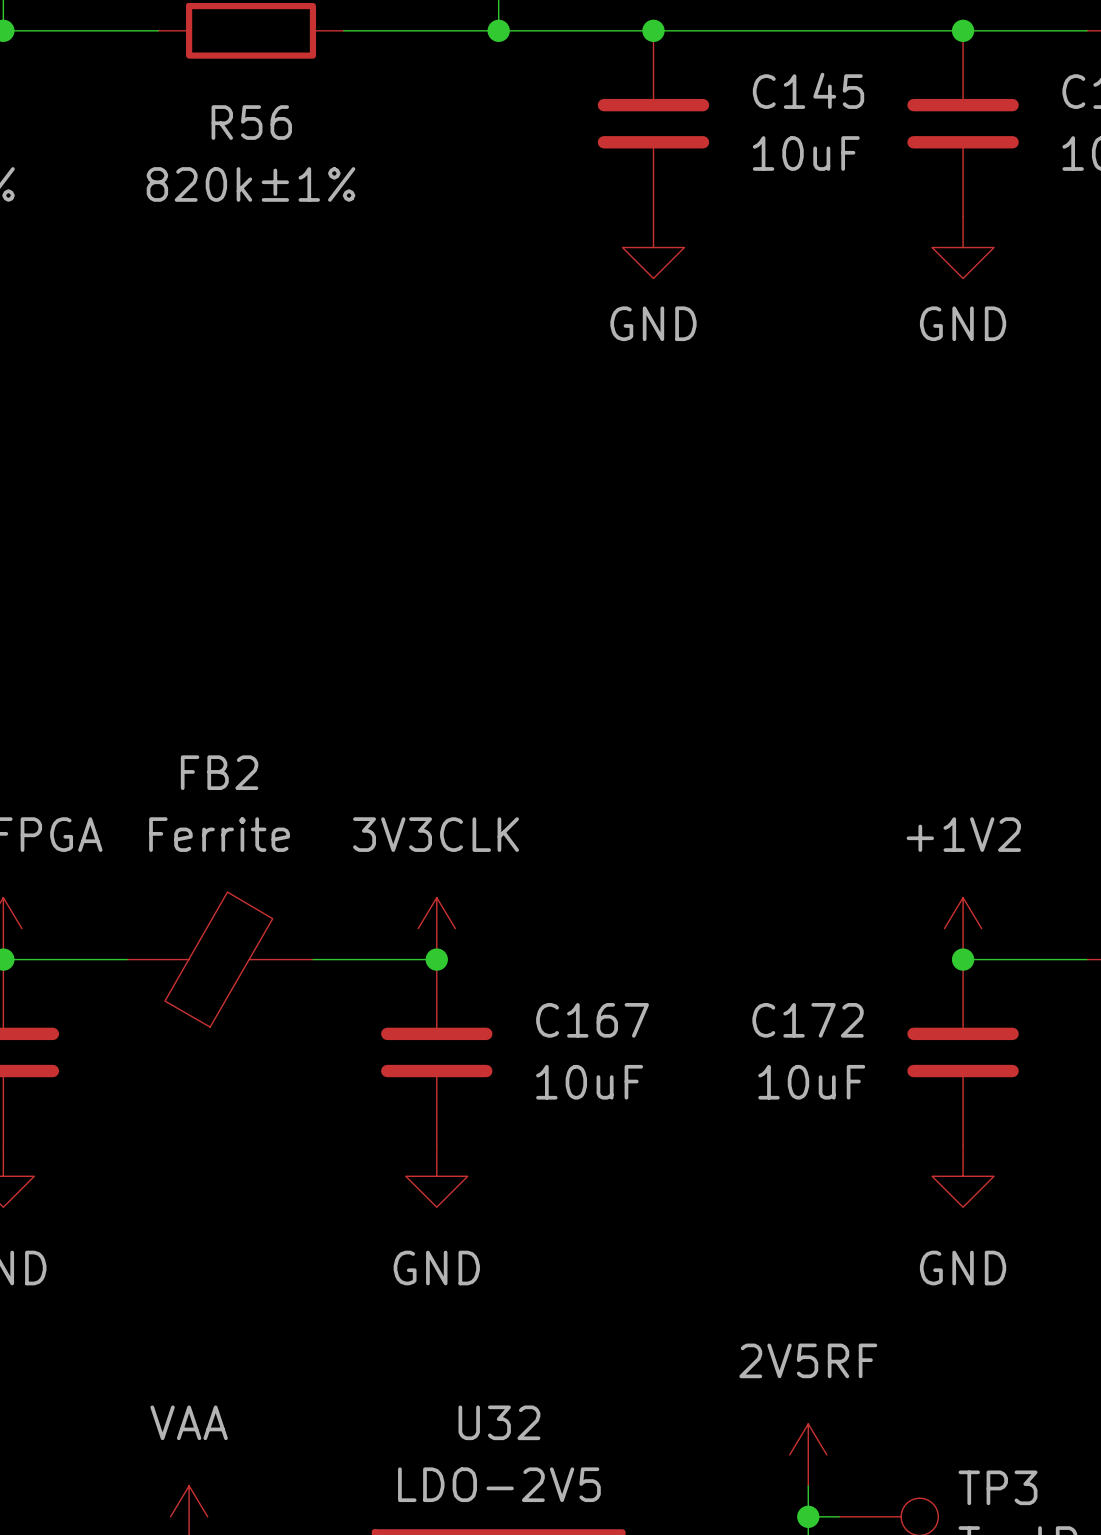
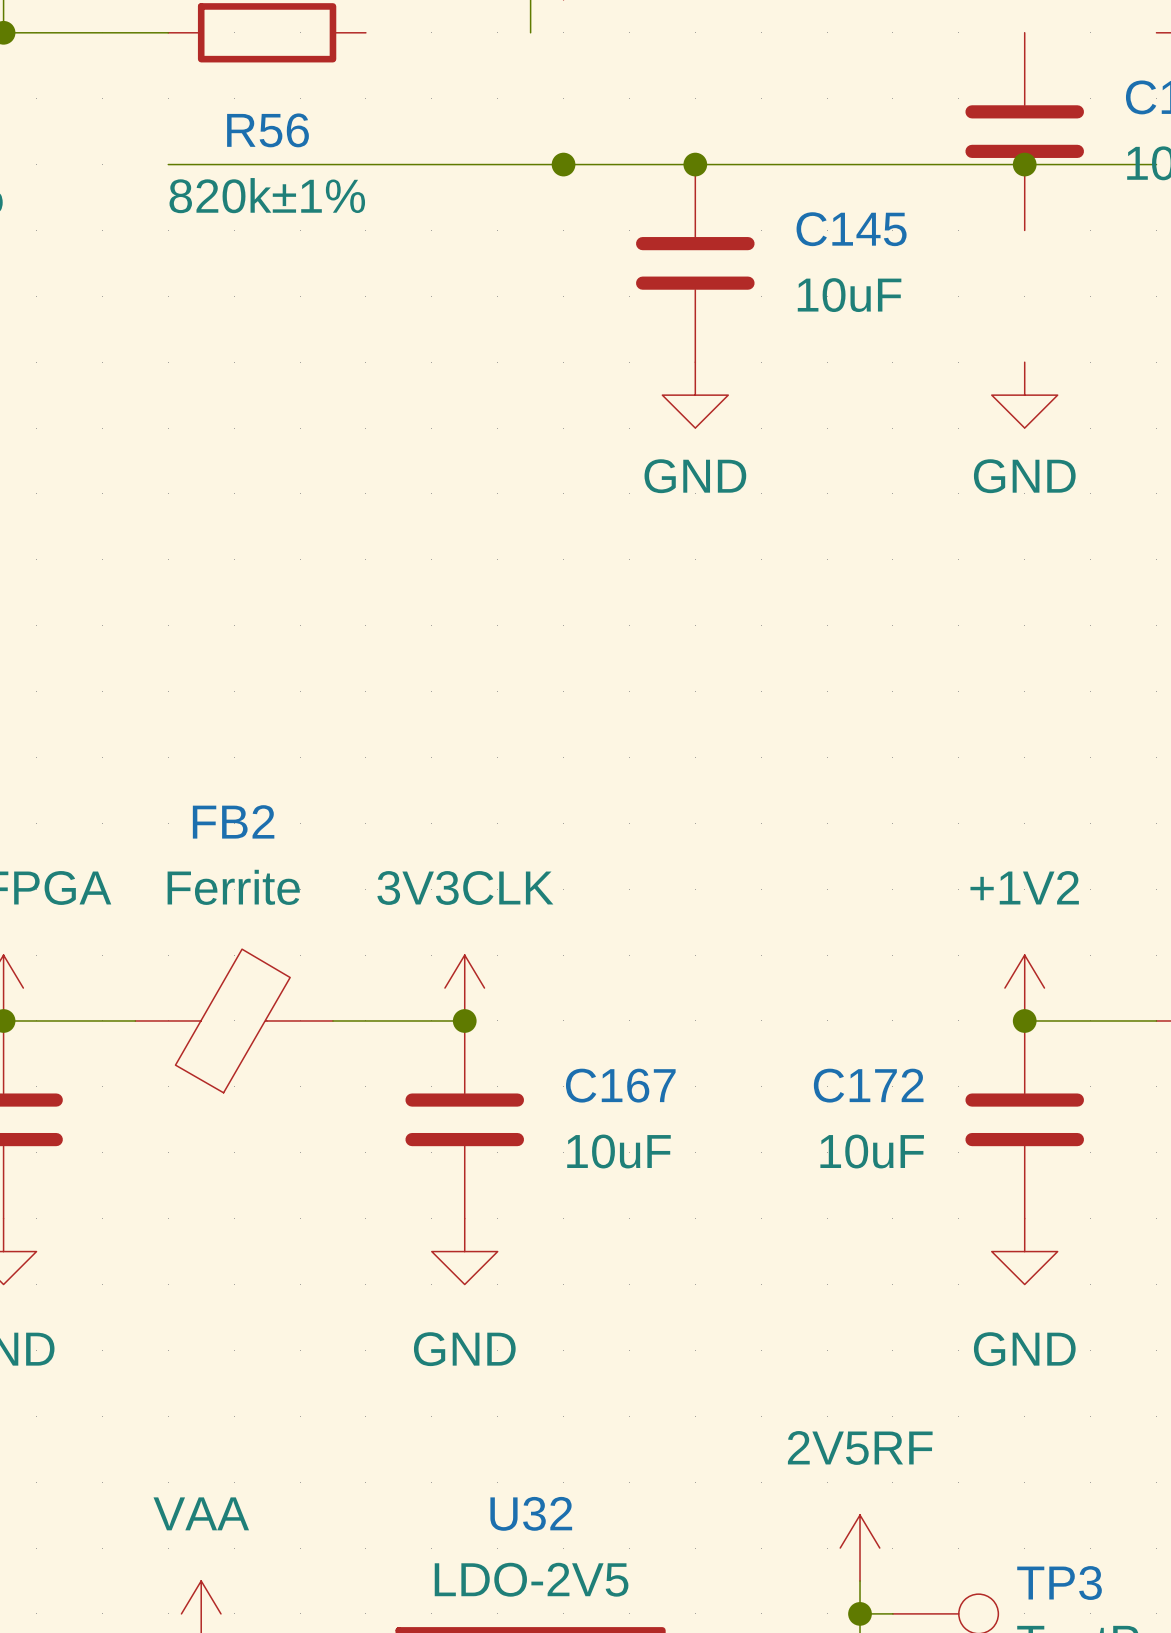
wire: (343, 30) (1086, 30) -> none
junction: (498, 30) -> none
junction: (653, 30) -> none
junction position: (963, 30) -> (1024, 164)
C145 position: (653, 123) -> (695, 263)
wire: none -> (168, 164) (1156, 164)
junction: none -> (563, 164)
junction: none -> (695, 164)
power symbol position: GND (653, 247) -> GND (695, 395)
power symbol position: GND (963, 247) -> GND (1024, 395)

